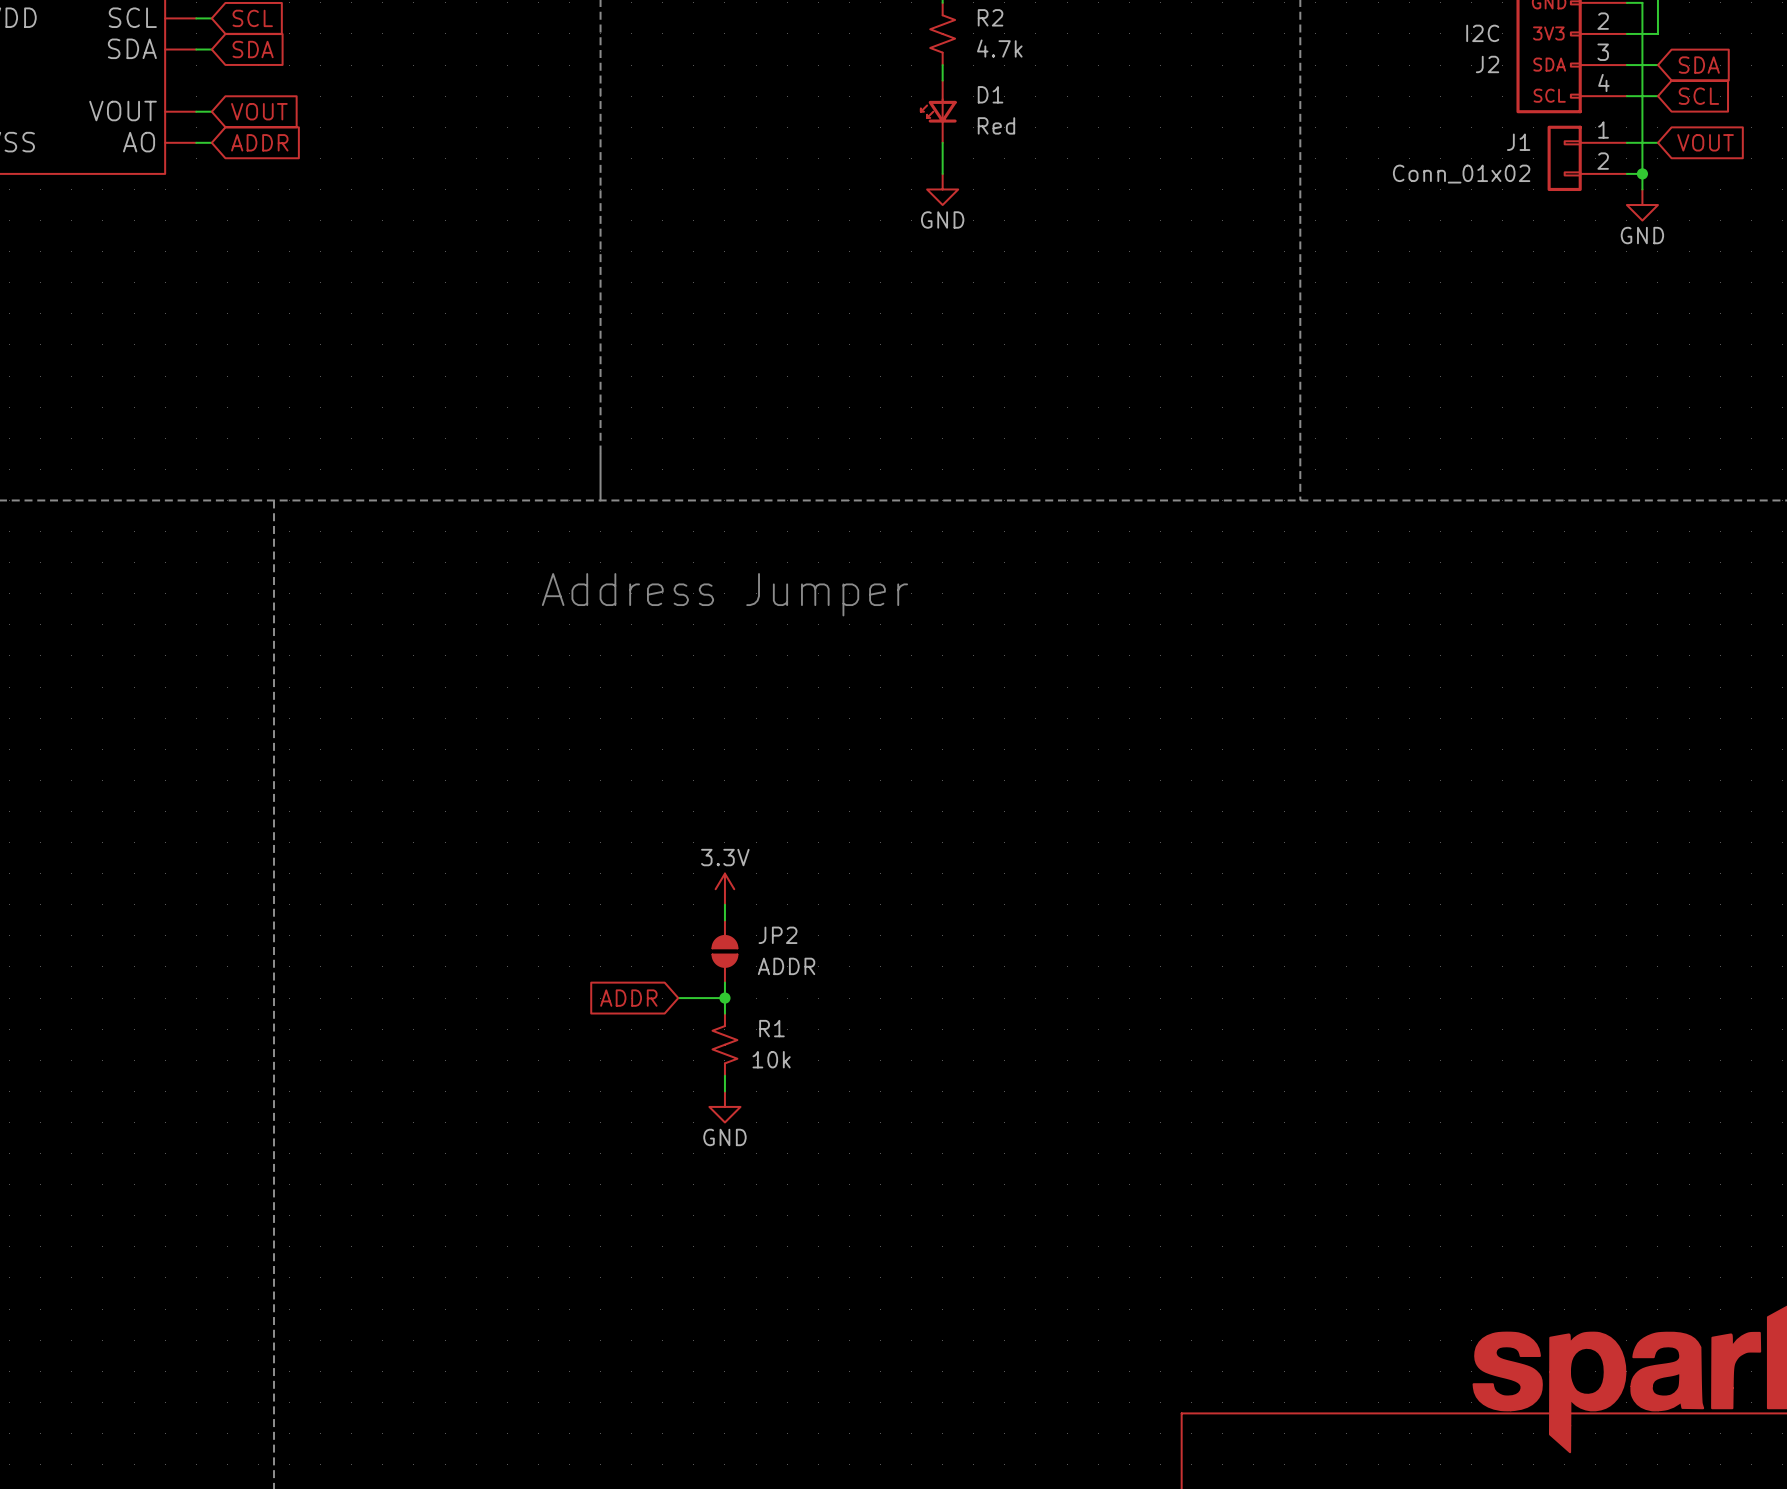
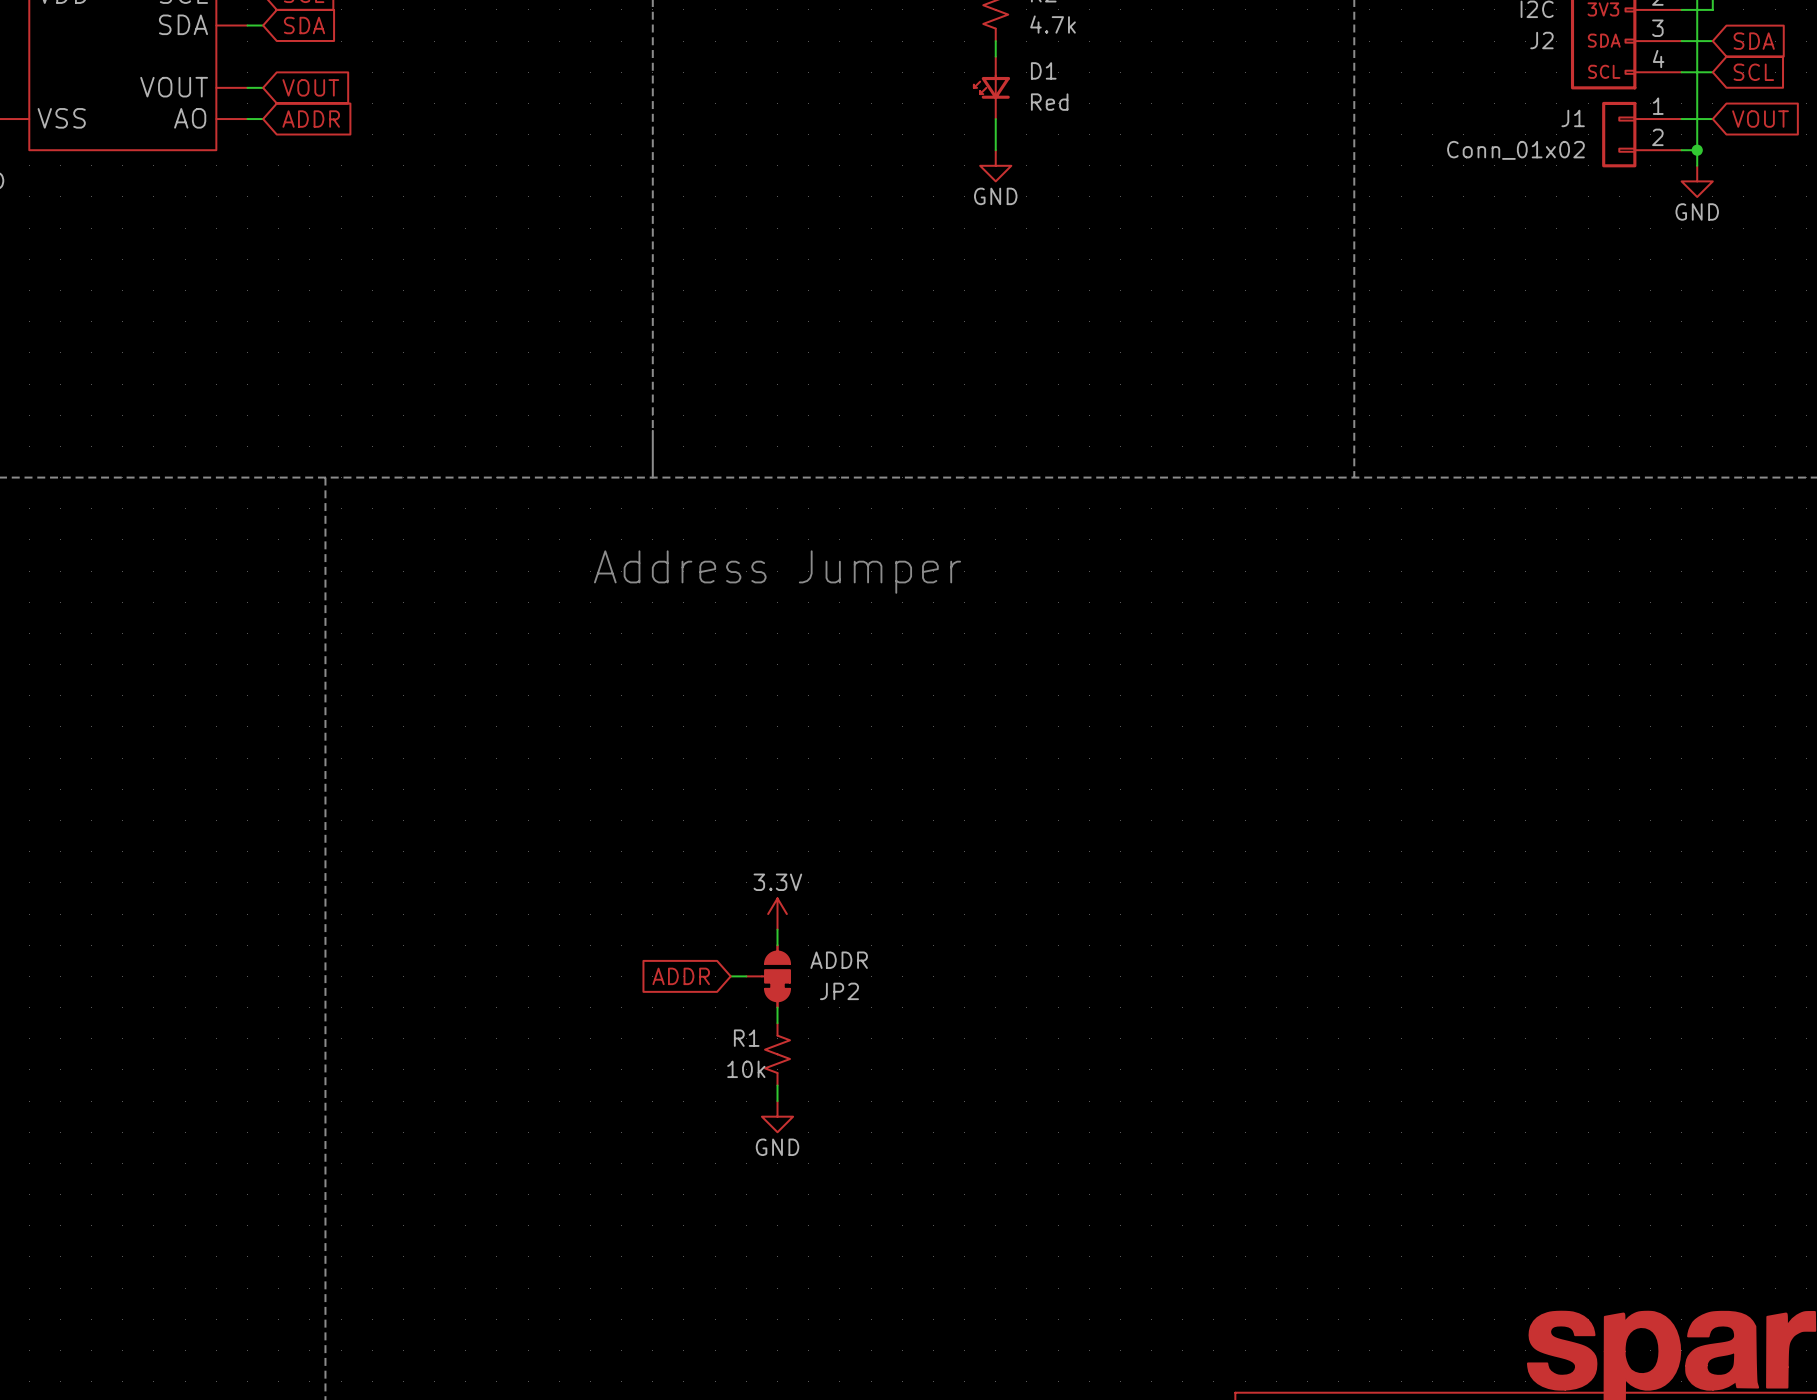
power symbol position: 3.3V (724, 889) -> 3.3V (777, 914)
JP2 symbol: [712, 920, 738, 983] -> [746, 945, 790, 1008]
JP2 name position: JP2 (778, 935) -> JP2 (839, 991)
JP2 value position: ADDR (786, 966) -> ADDR (839, 960)
junction: (724, 998) -> none
wire: none -> (777, 1007) (777, 1023)
R1 flip: as is (724, 1044) -> left-right (777, 1054)
wire: (724, 1075) (724, 1091) -> (777, 1085) (777, 1101)
power symbol position: GND (724, 1106) -> GND (777, 1116)

